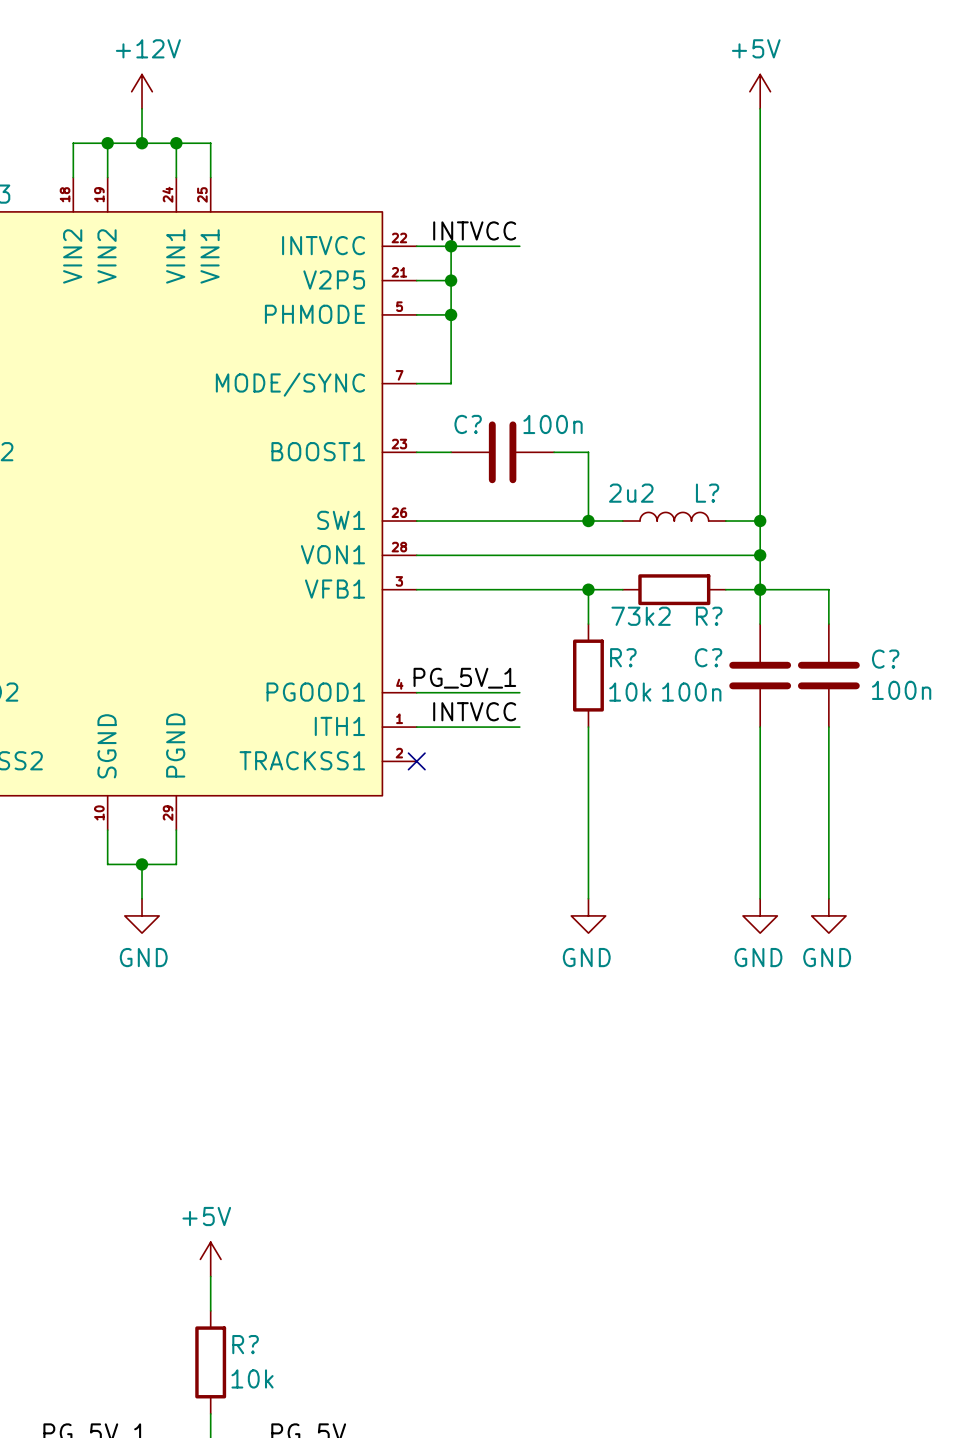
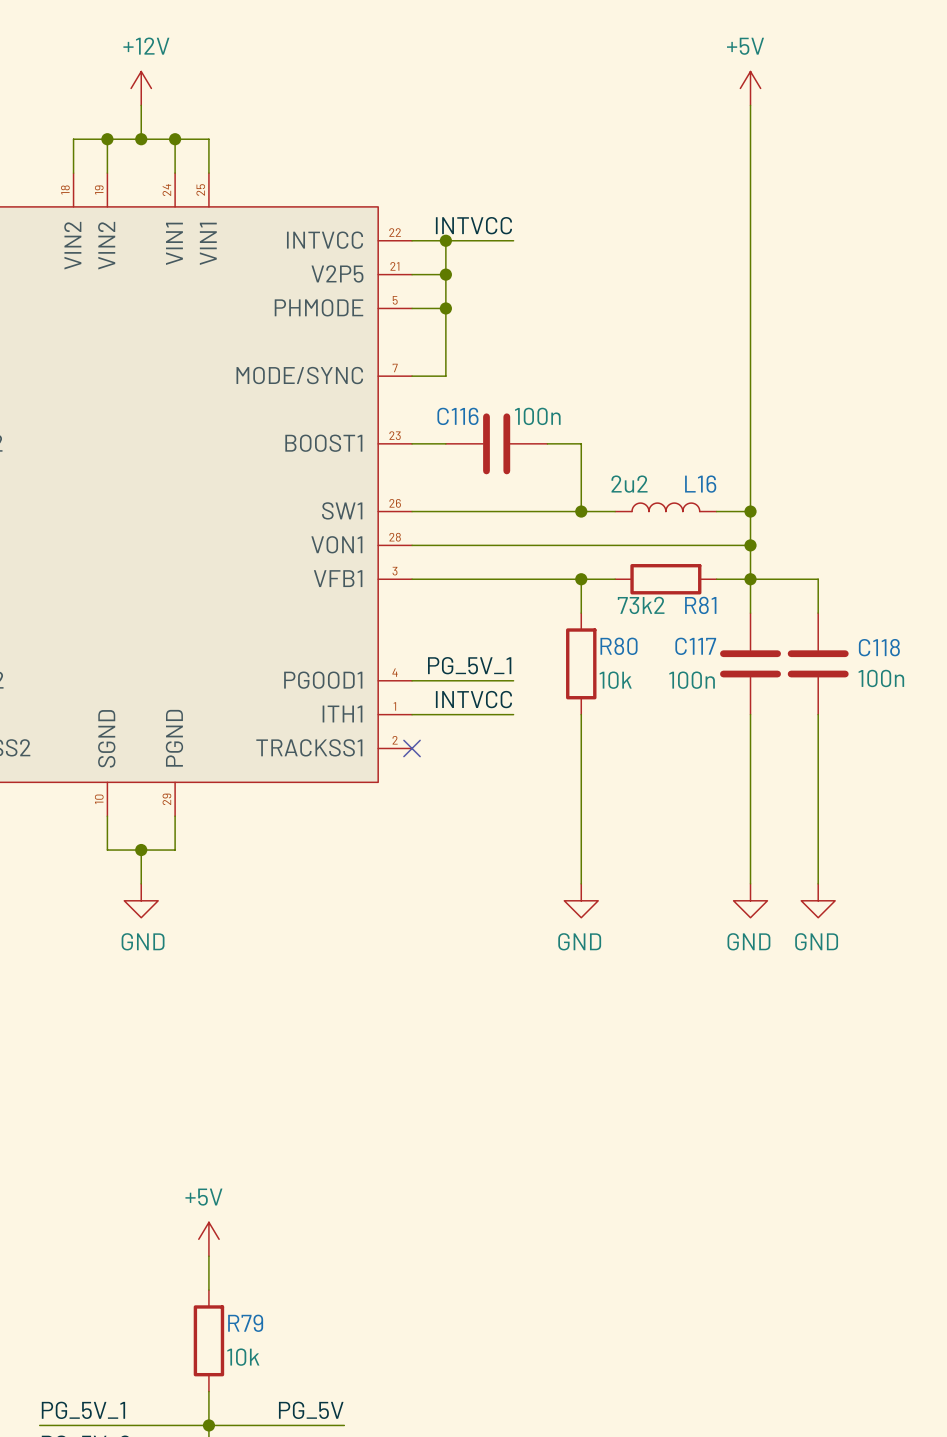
C? name: C? (468, 424) -> C116 (457, 416)
L? name: L? (707, 493) -> L16 (700, 484)
R? name: R? (709, 616) -> R81 (700, 605)
R? name: R? (623, 657) -> R80 (619, 646)
C? name: C? (708, 657) -> C117 (695, 646)
C? name: C? (885, 659) -> C118 (879, 647)
R? name: R? (245, 1344) -> R79 (245, 1323)

